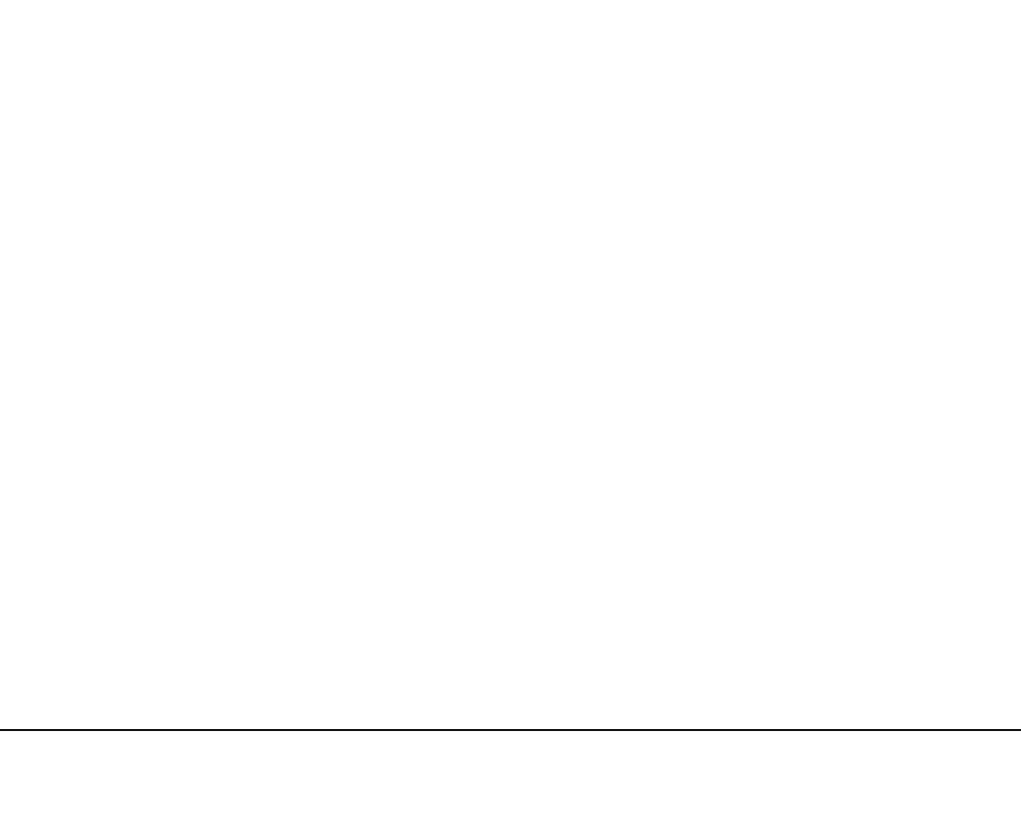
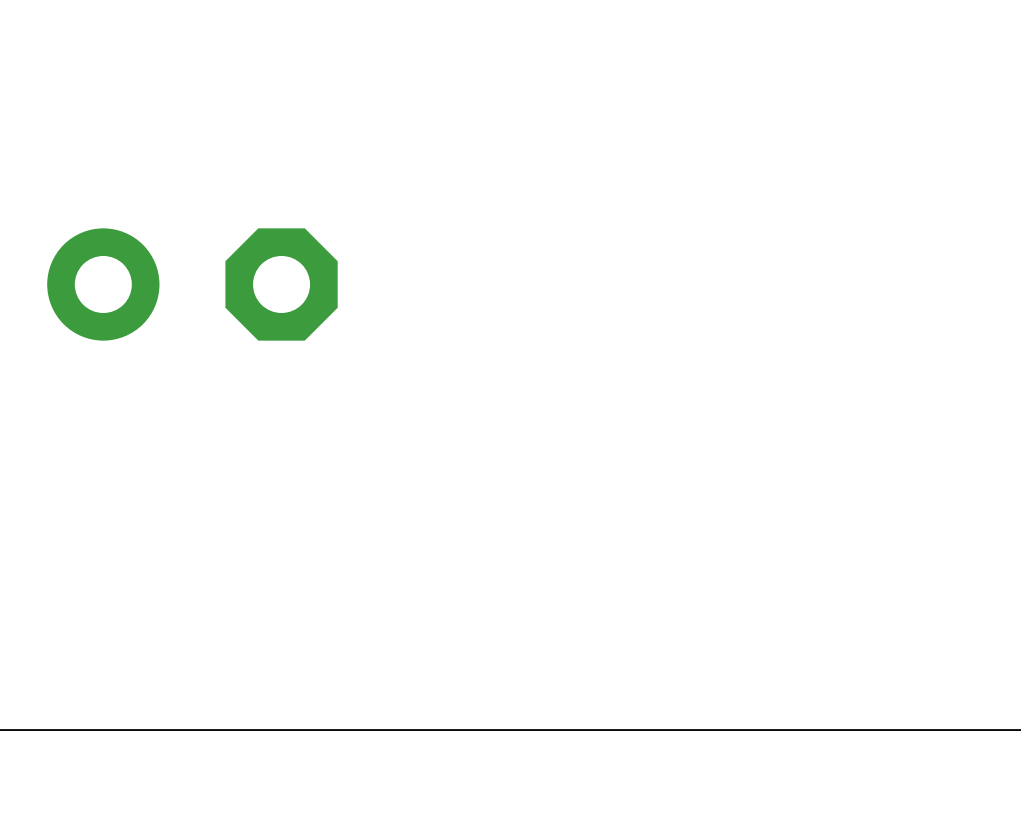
part: none -> (192, 284)

